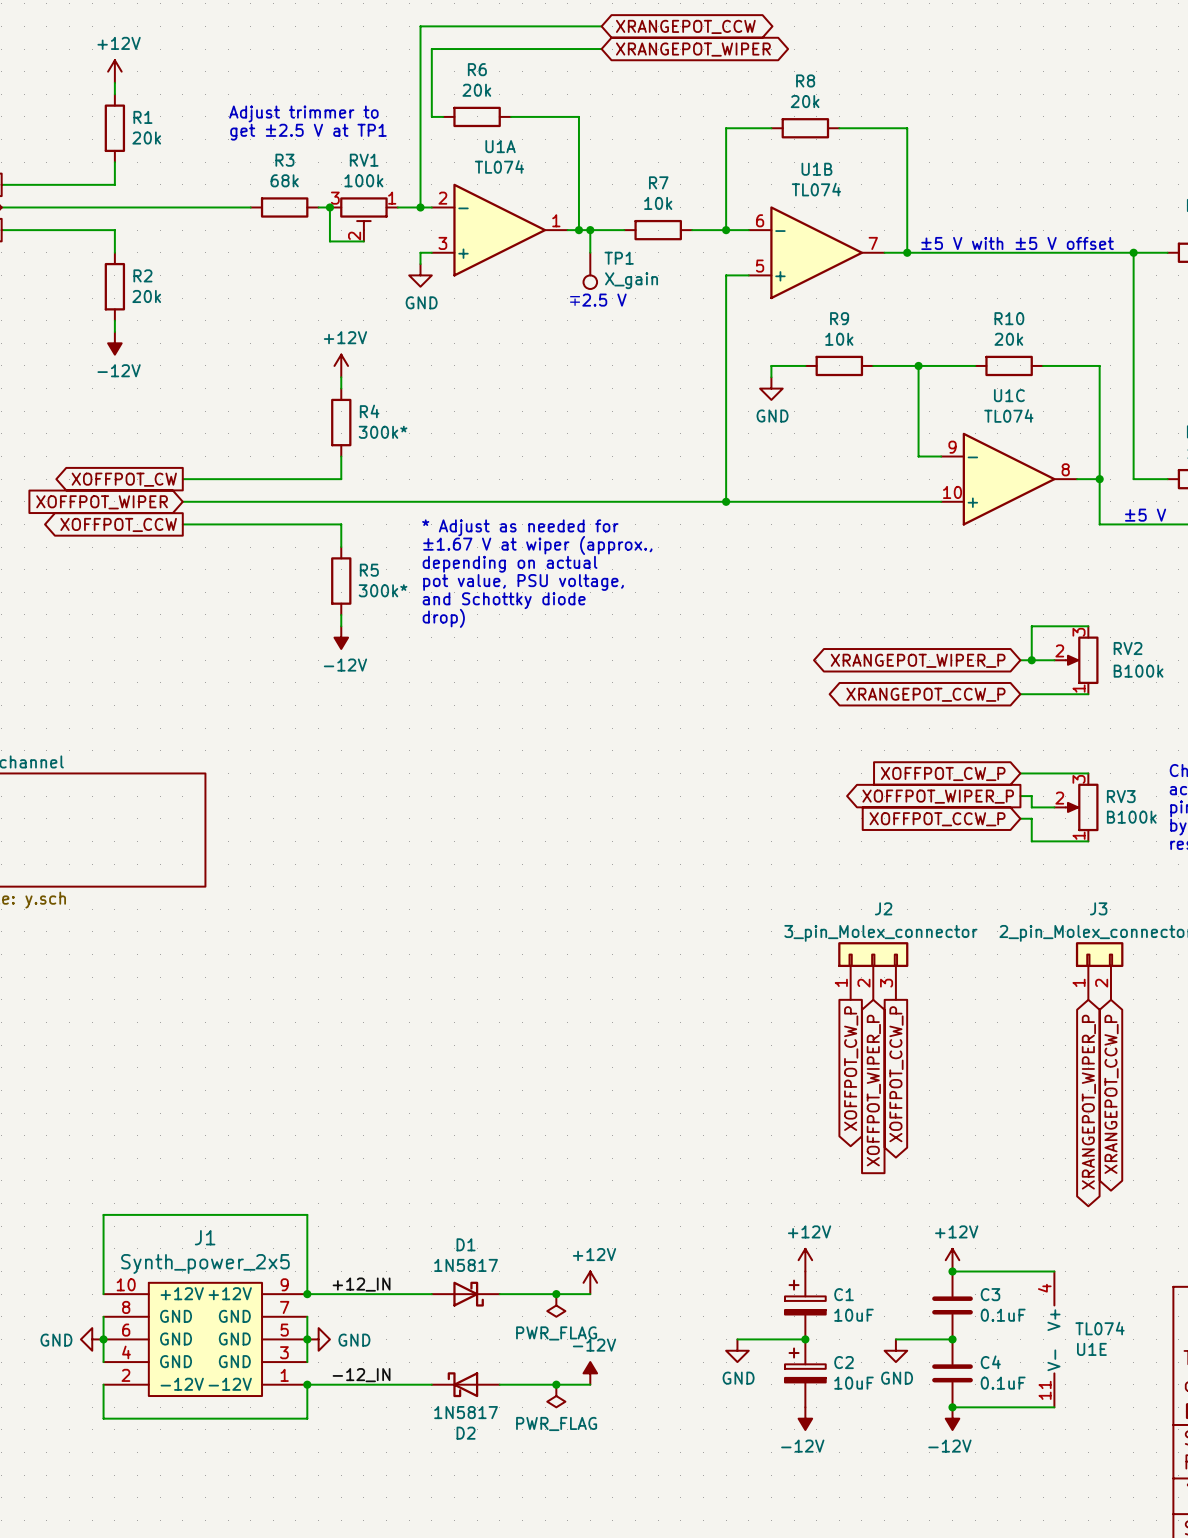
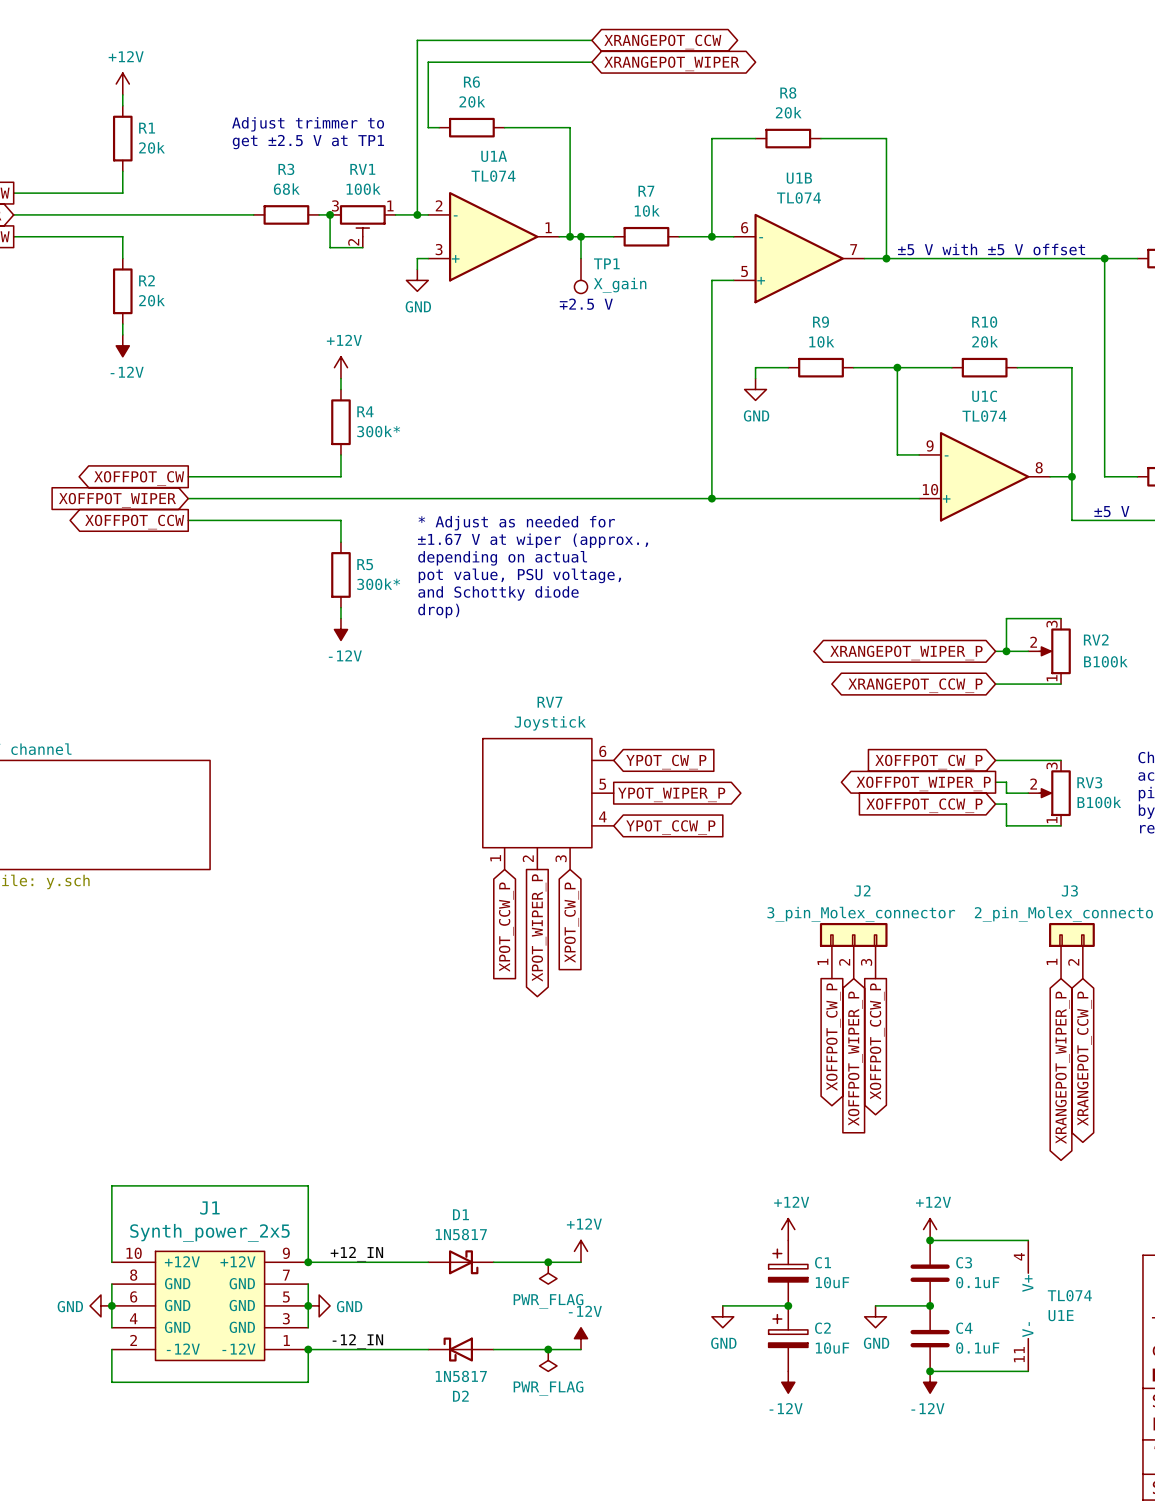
global label: none -> YPOT_CW_P (666, 762)
global label: none -> YPOT_WIPER_P (671, 794)
RV7: none -> Joystick (548, 804)
global label: none -> YPOT_CCW_P (670, 827)
global label: none -> XPOT_CW_P (571, 922)
global label: none -> XPOT_CCW_P (506, 927)
global label: none -> XPOT_WIPER_P (539, 927)

